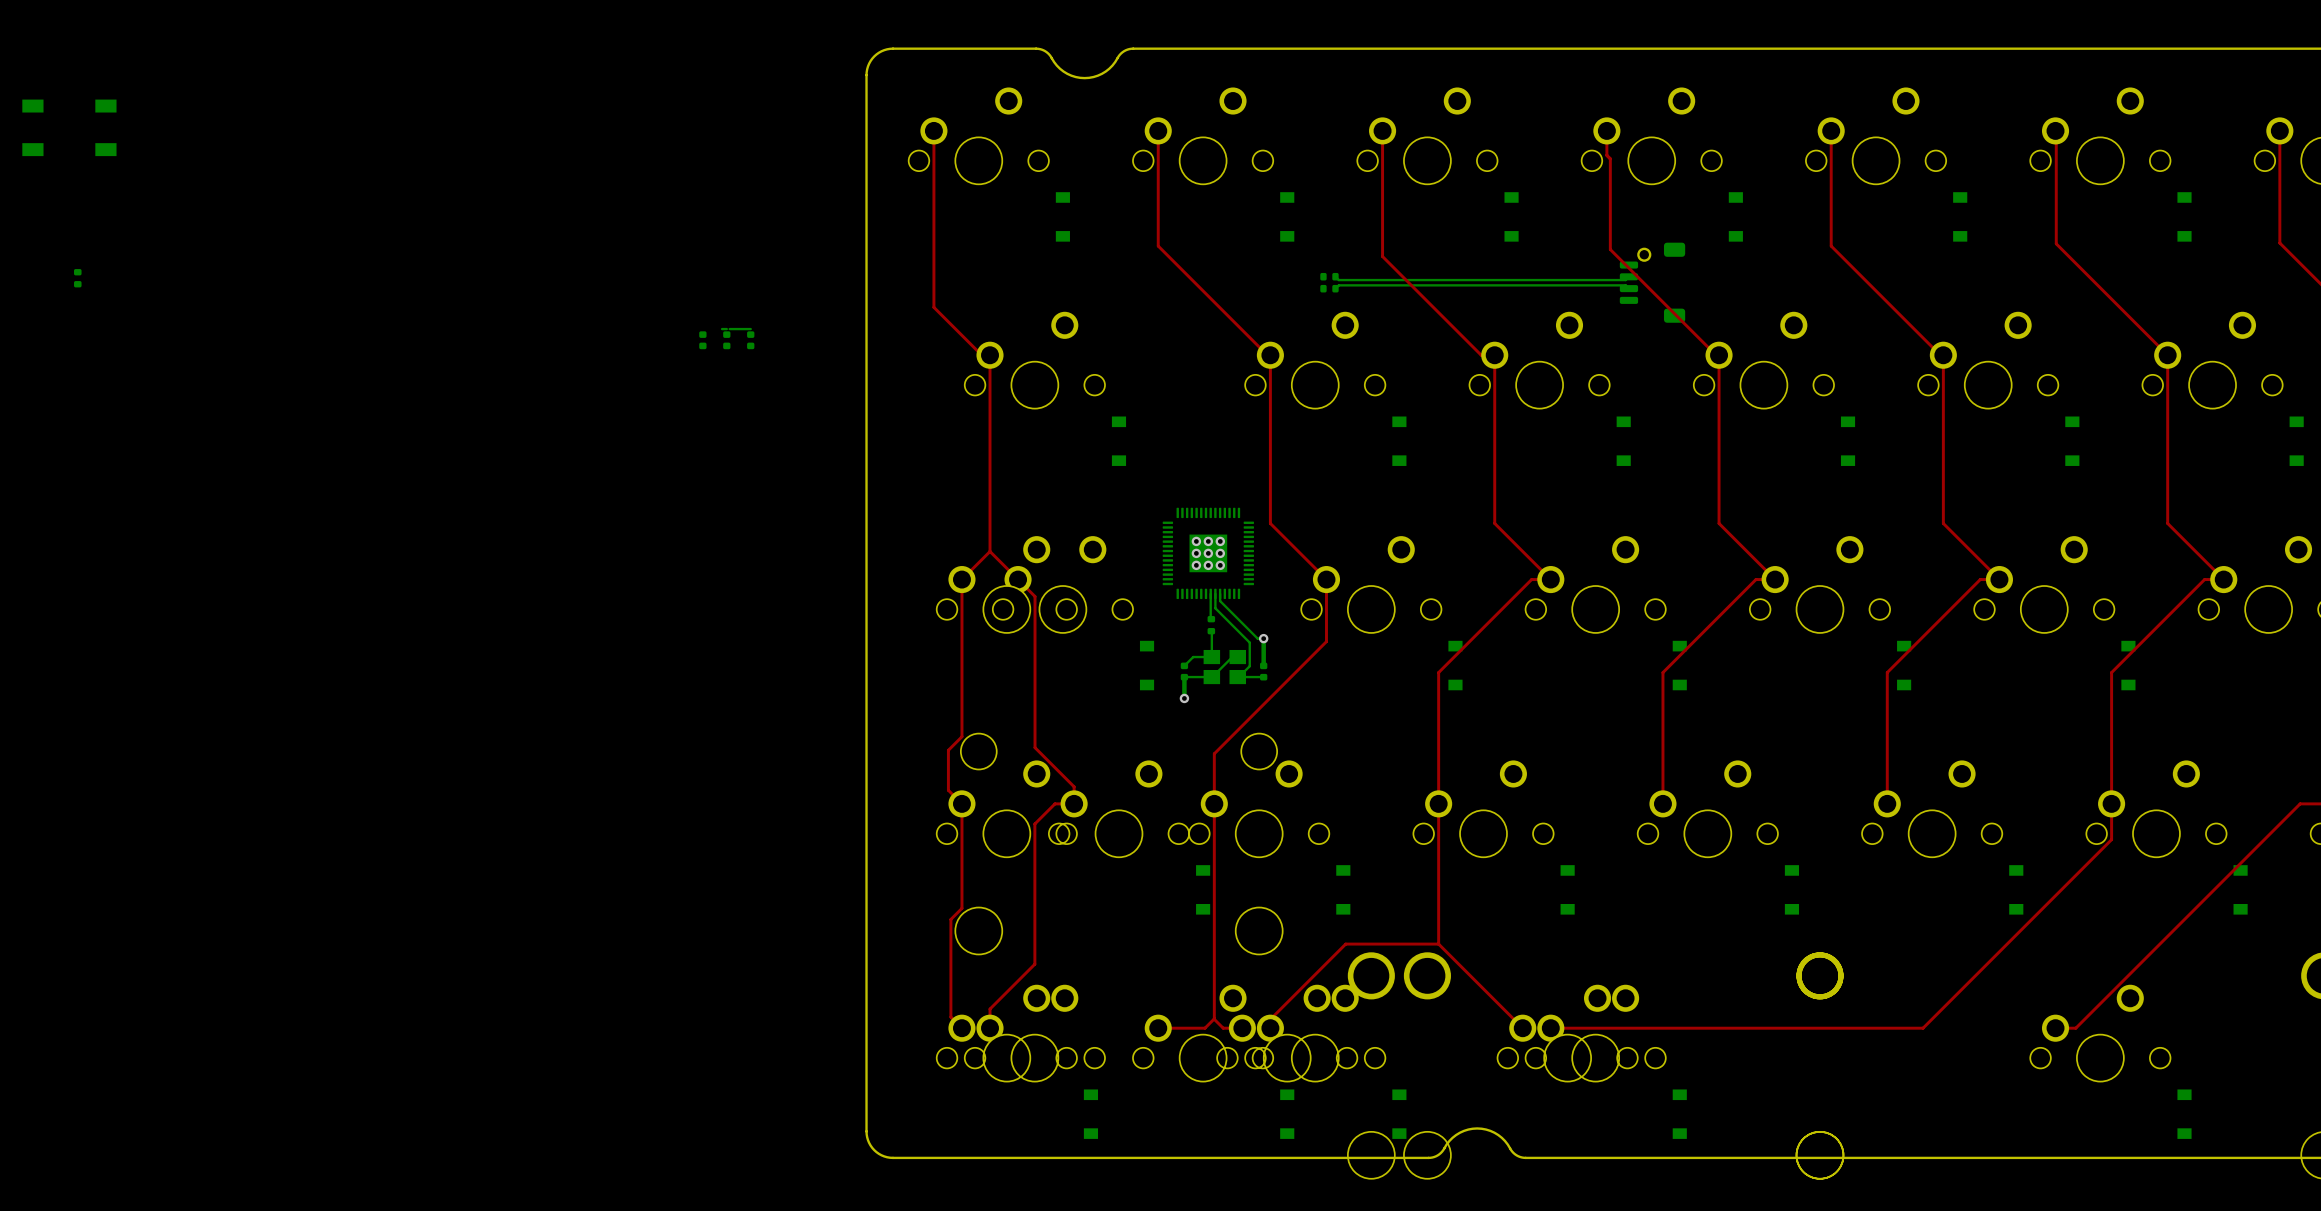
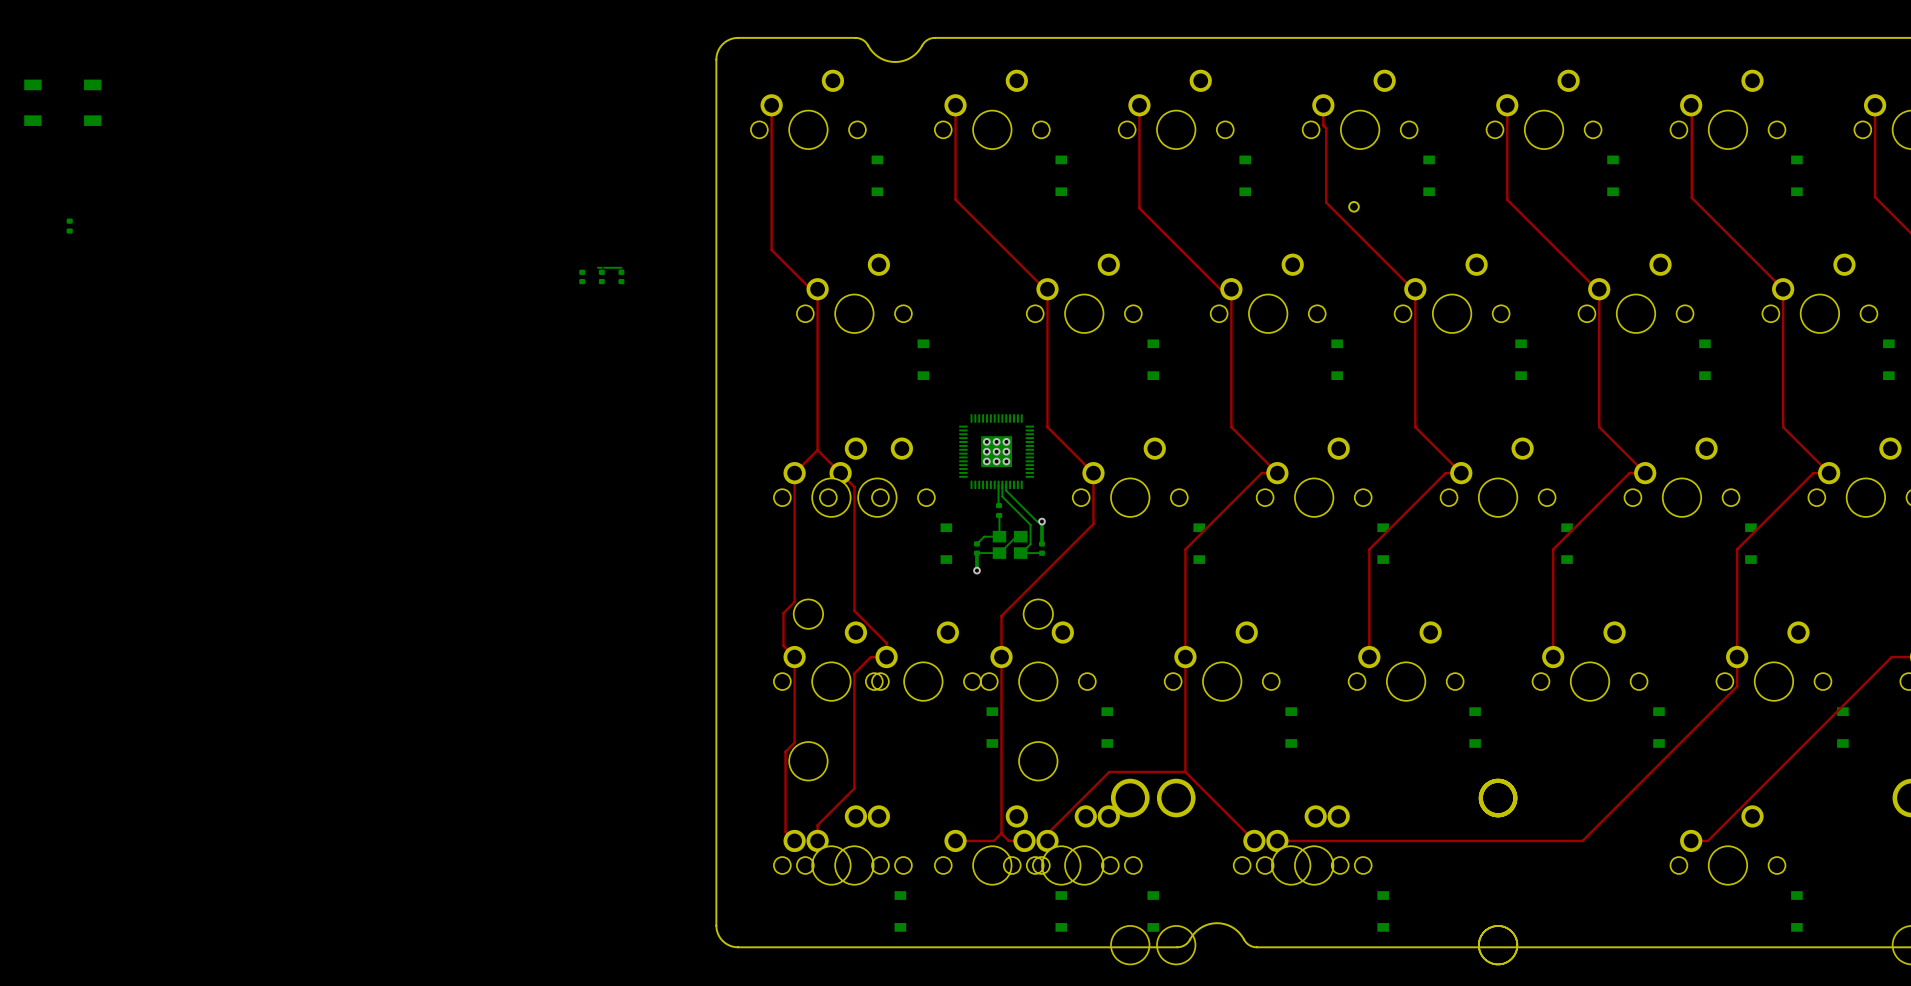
part: (1329, 276) -> none
bottom track: (1335, 276) (1338, 280) (1625, 280) (1628, 276) -> none
part: (1652, 282) -> none
part: (1329, 288) -> none
bottom track: (1628, 288) (1625, 285) (1338, 285) (1335, 288) -> none

